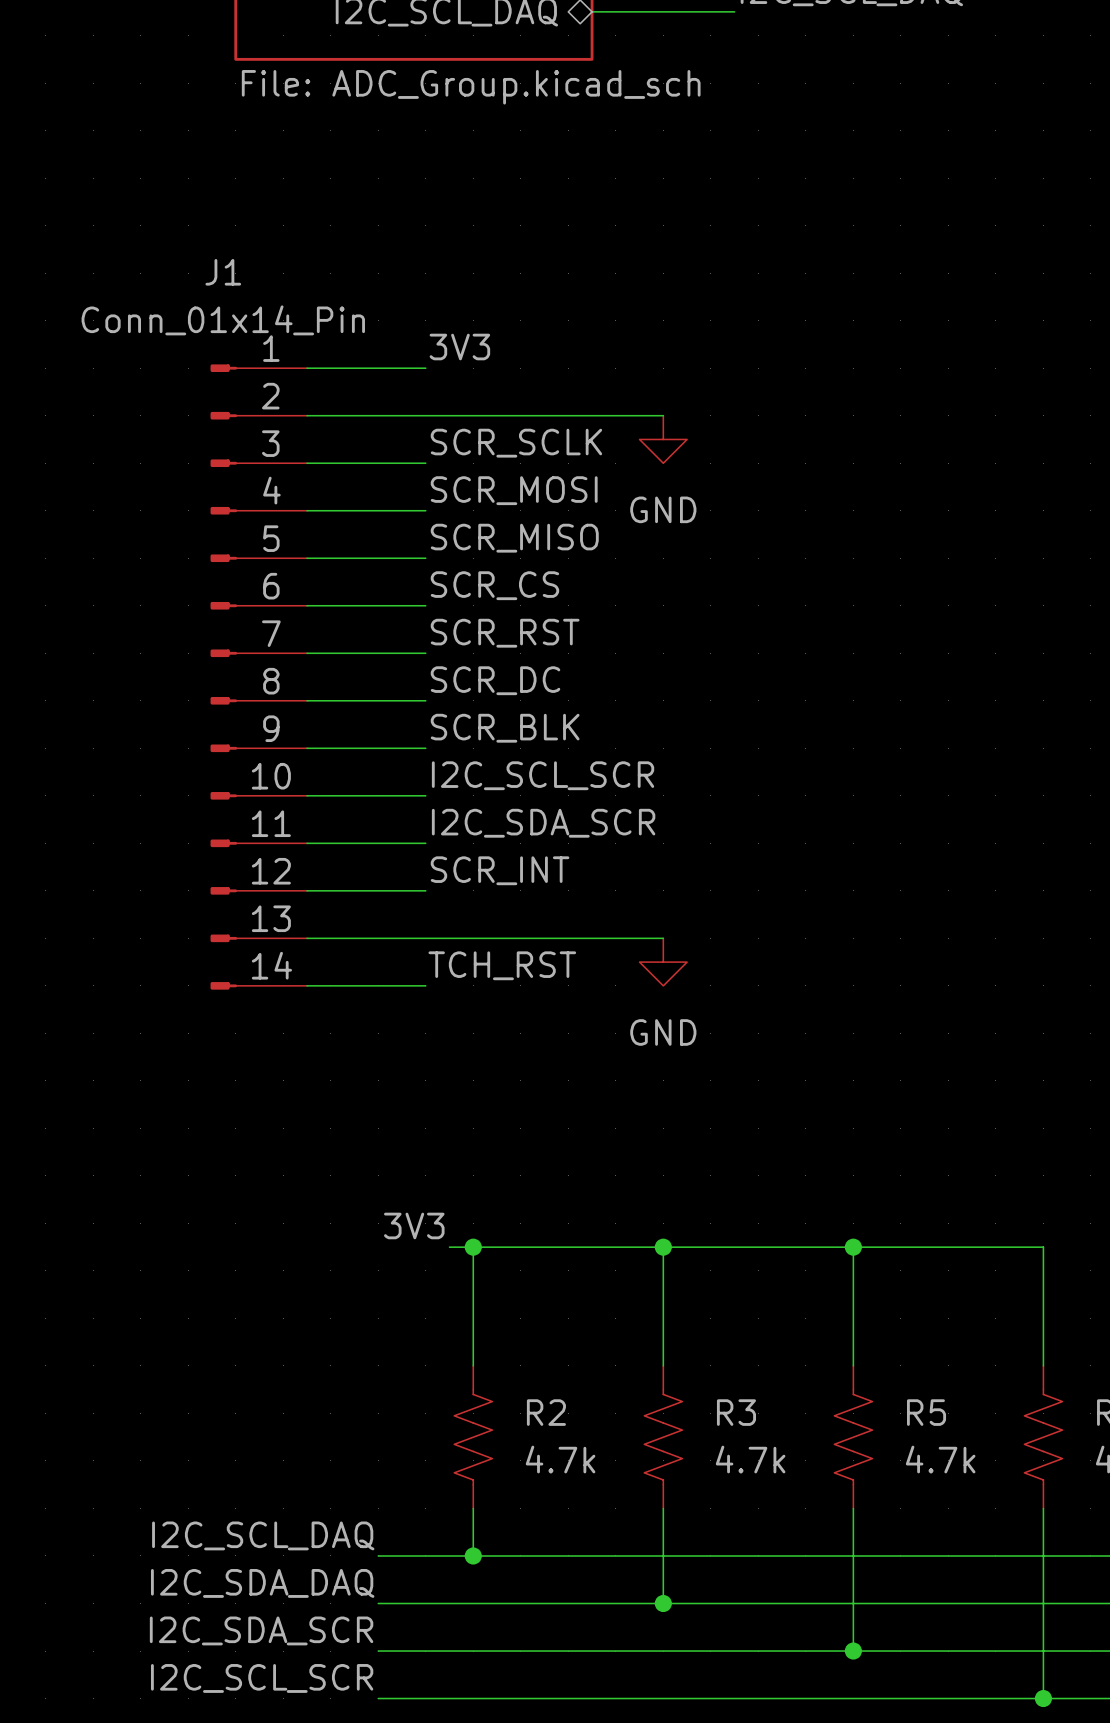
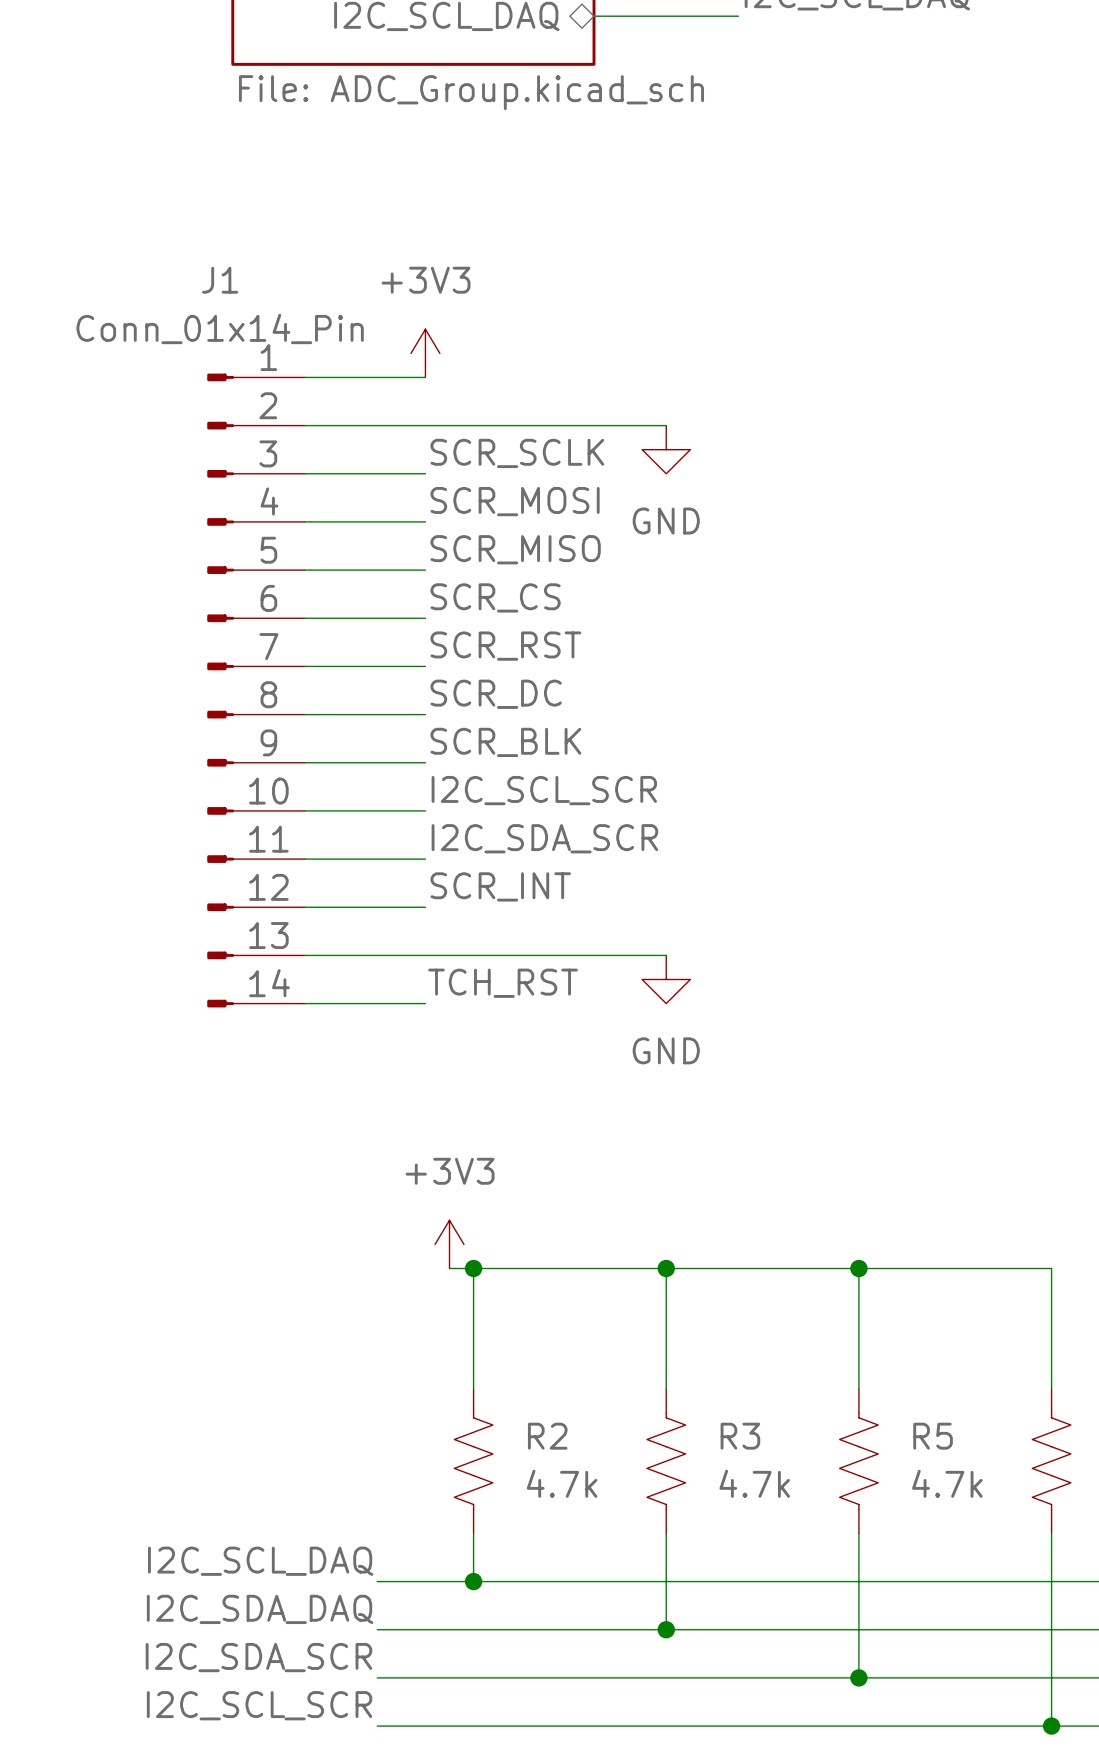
power symbol: none -> +3V3 (425, 353)
label: 3V3 (459, 347) -> none
power symbol: none -> +3V3 (449, 1244)
label: 3V3 (414, 1225) -> none

